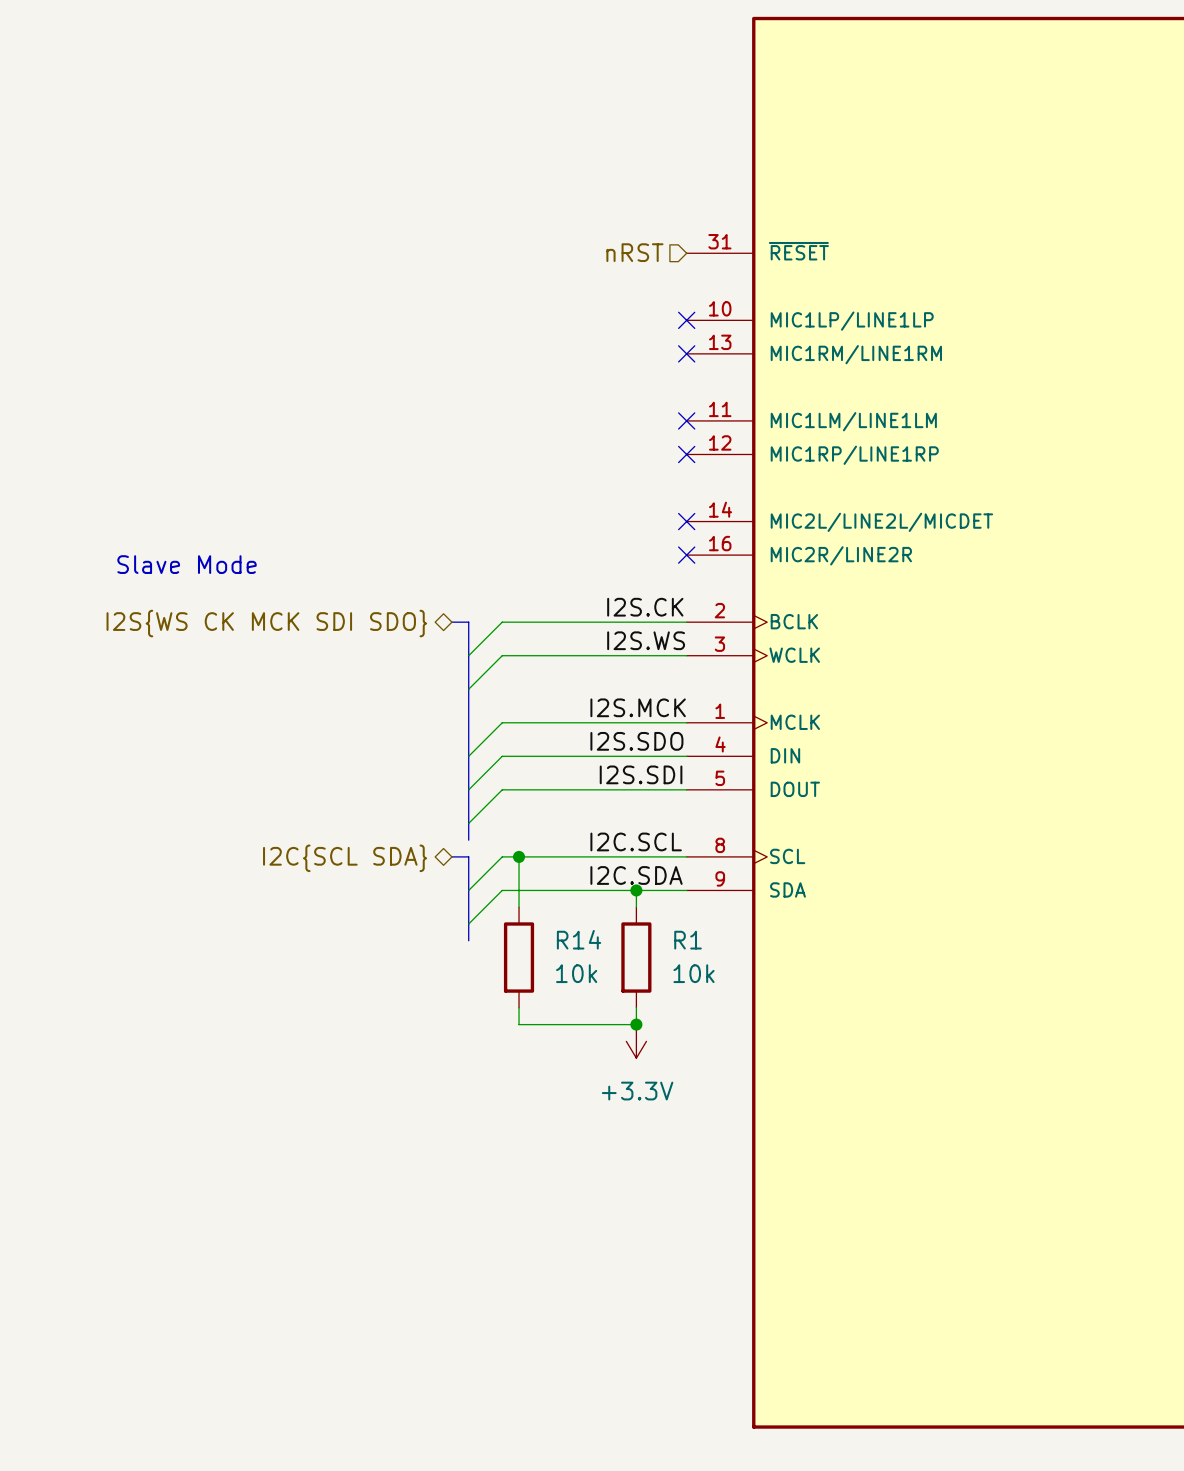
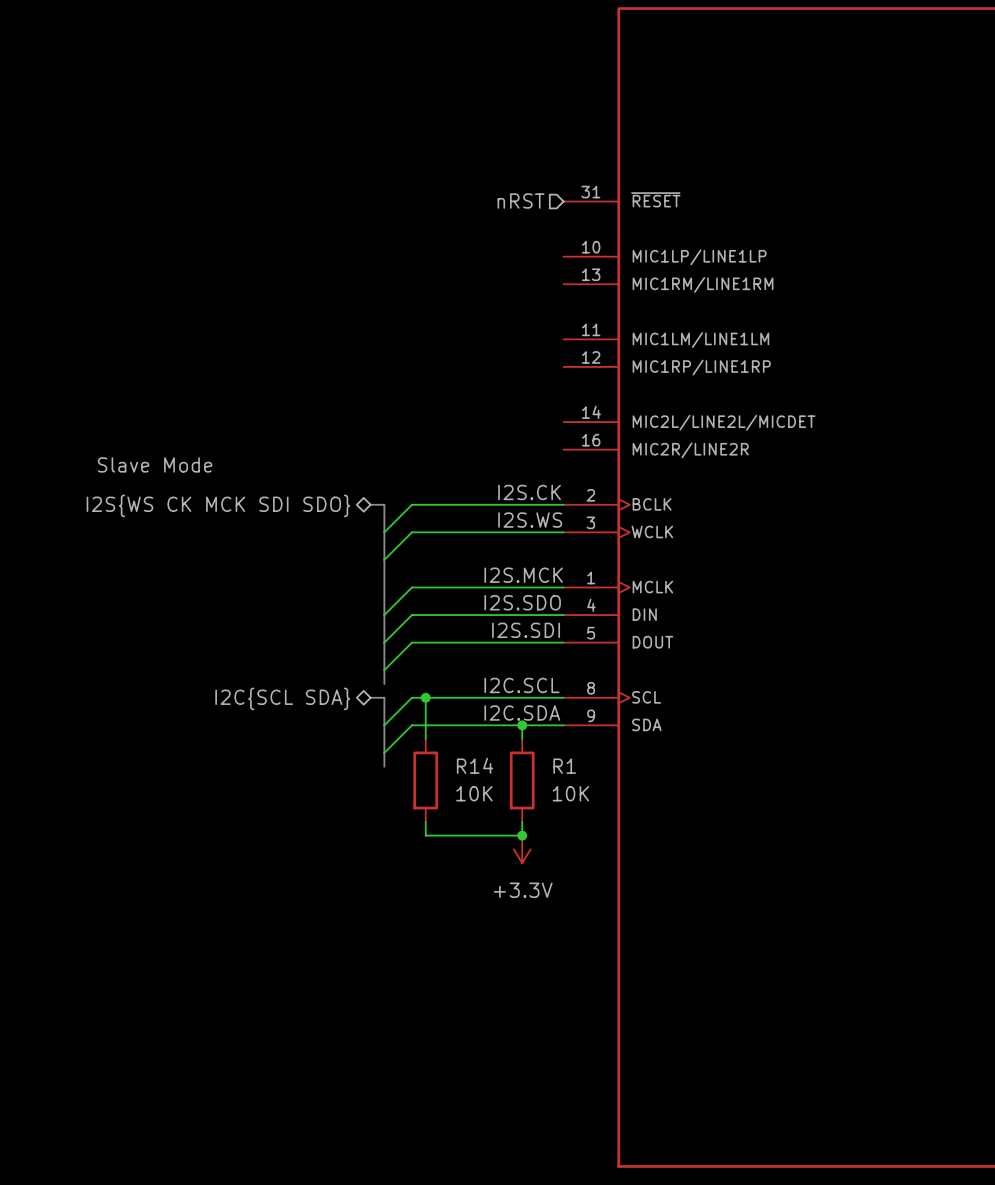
no-connect mark: (686, 320) -> none
no-connect mark: (686, 353) -> none
no-connect mark: (686, 420) -> none
no-connect mark: (686, 454) -> none
no-connect mark: (686, 521) -> none
no-connect mark: (686, 555) -> none
text: Slave Mode (187, 564) -> none
label: none -> Slave Mode (155, 464)
R14 value: 10k (576, 973) -> 10K (474, 793)
R1 value: 10k (694, 973) -> 10K (570, 793)

